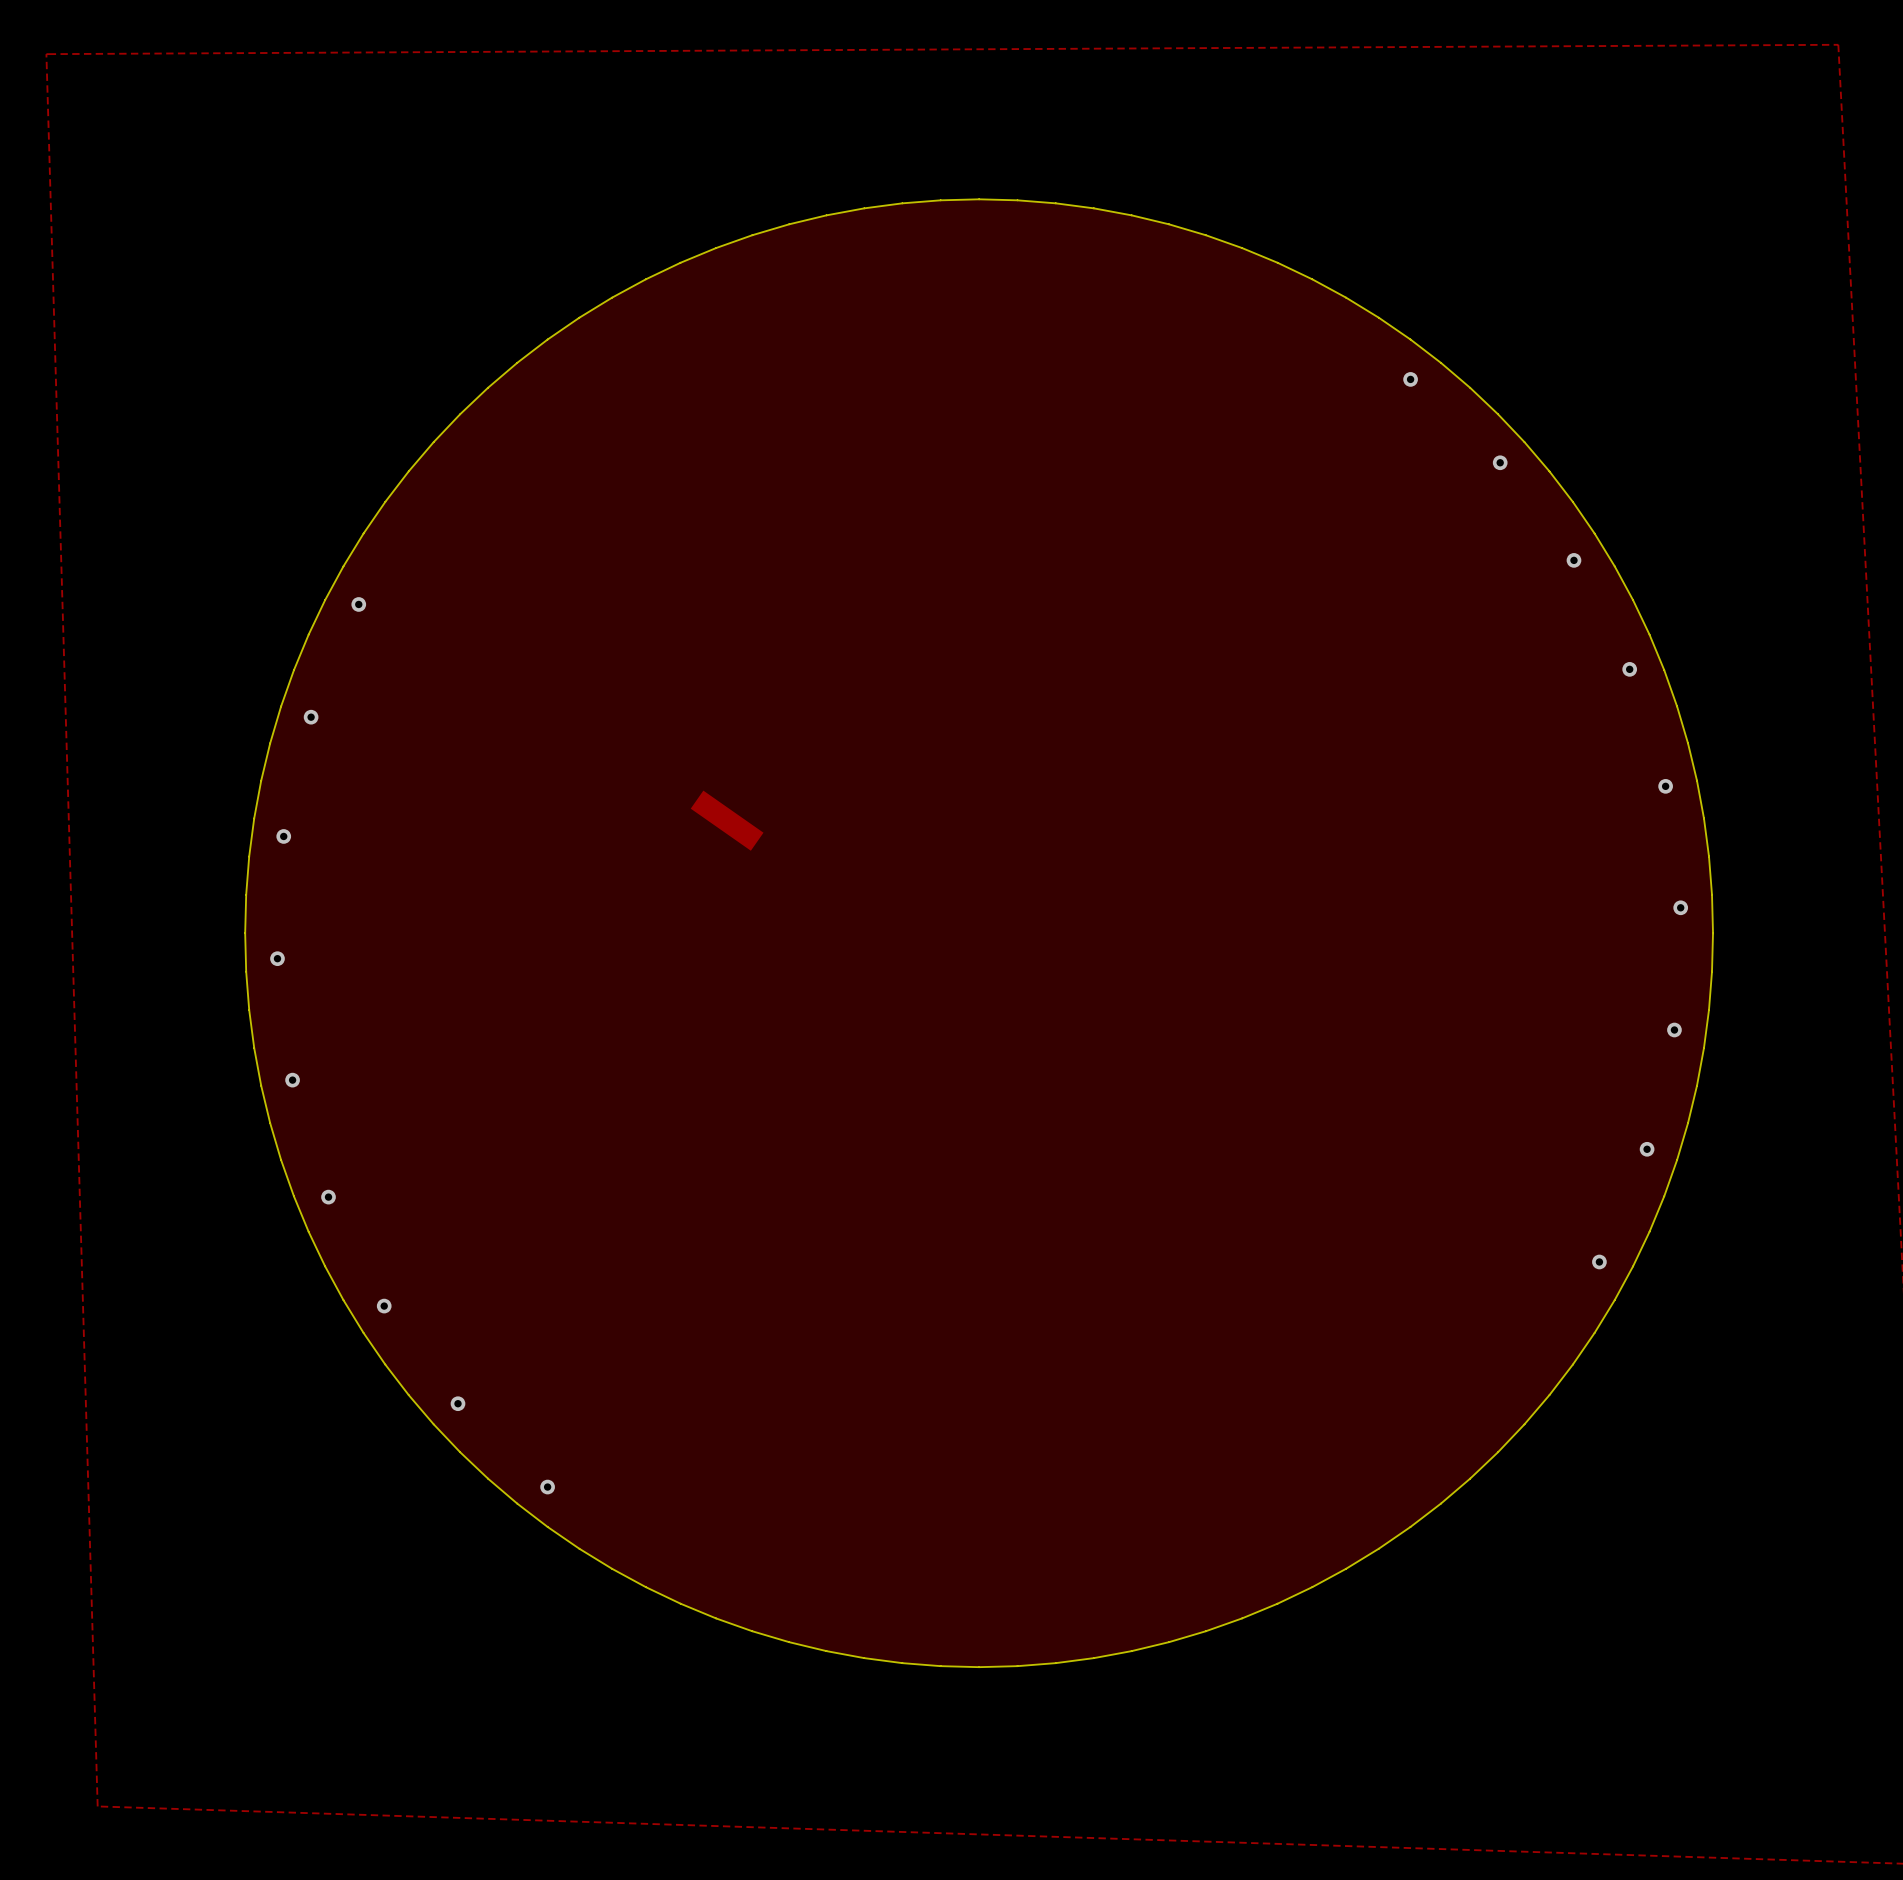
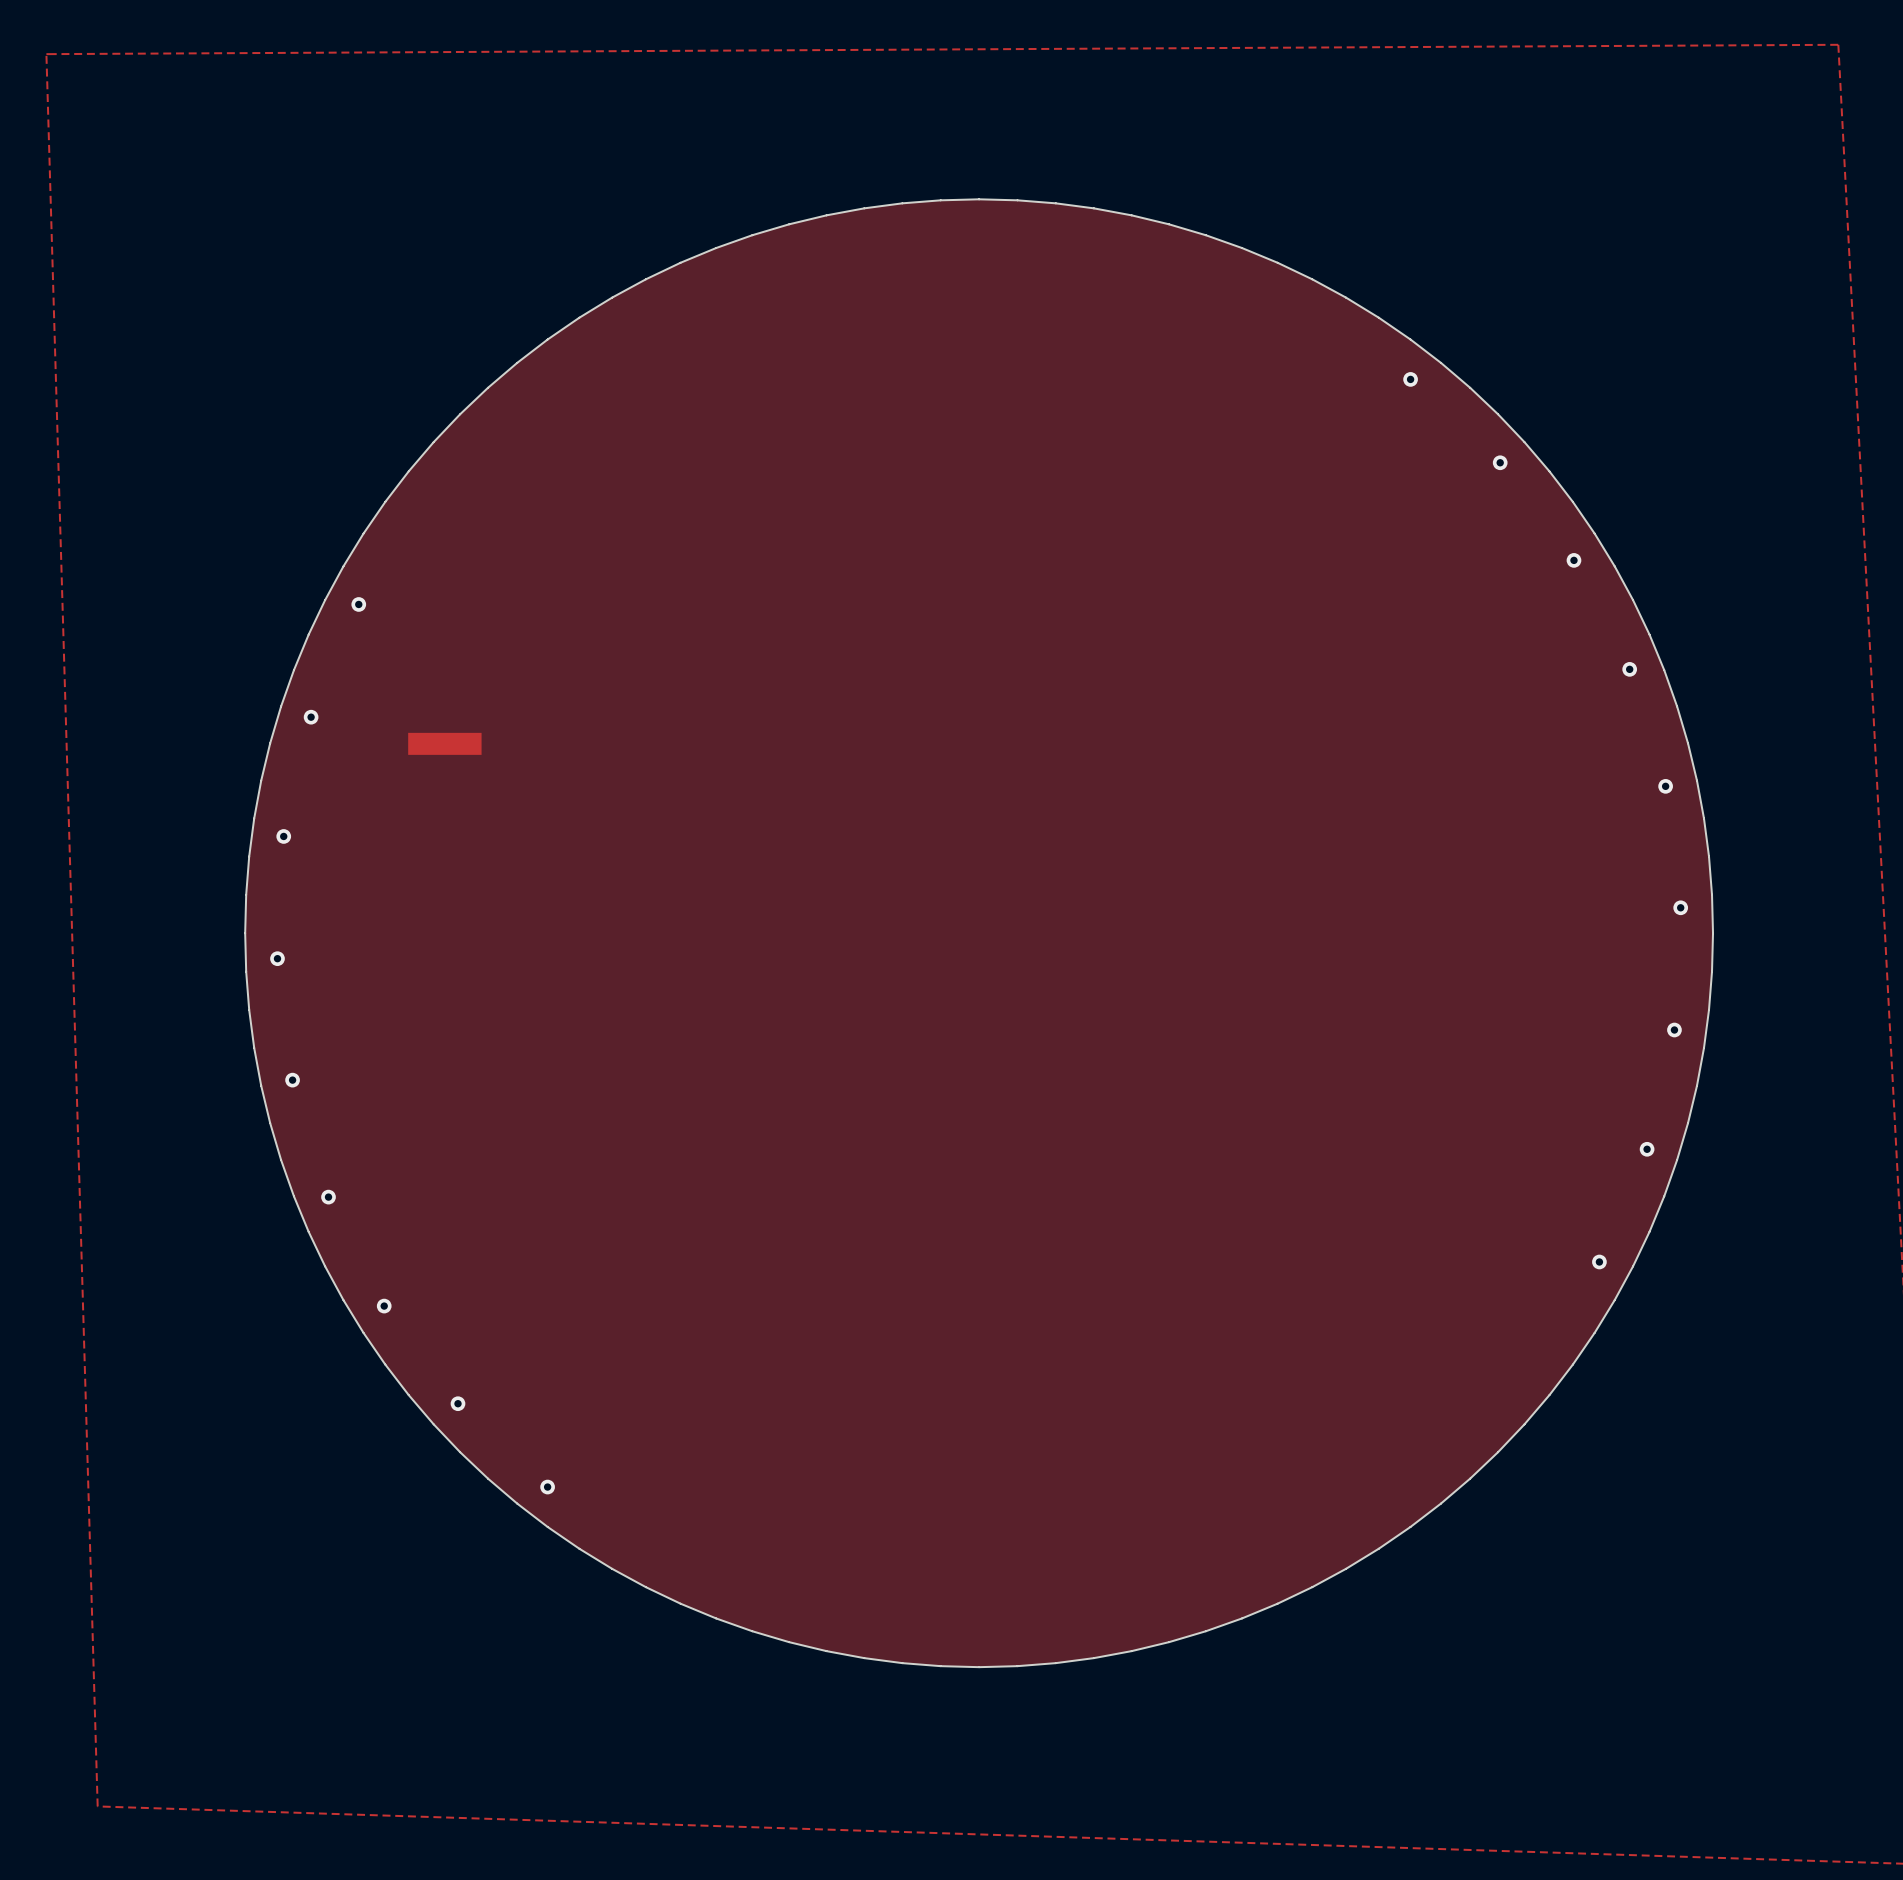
part: none -> (444, 743)
part: (727, 820) -> none

